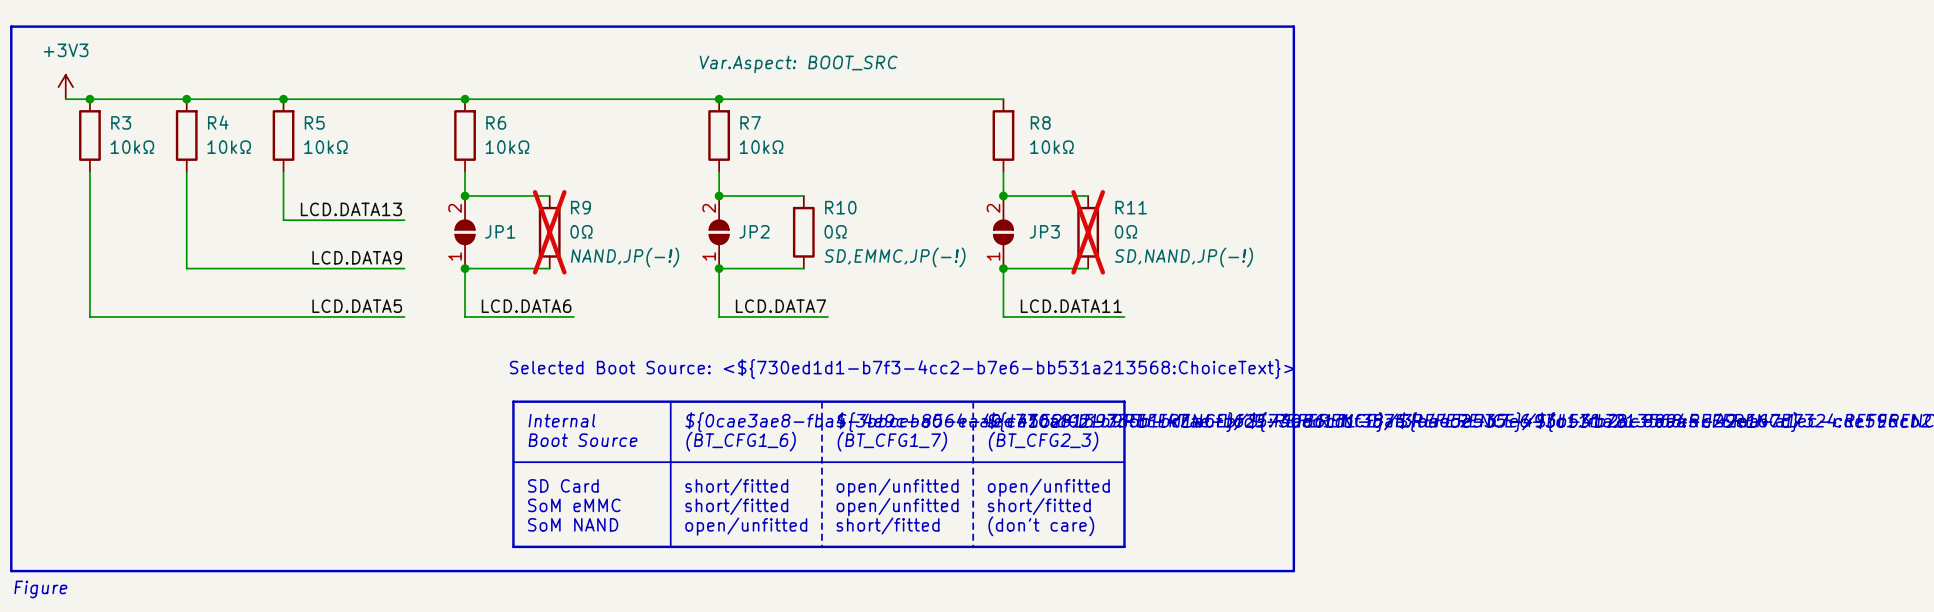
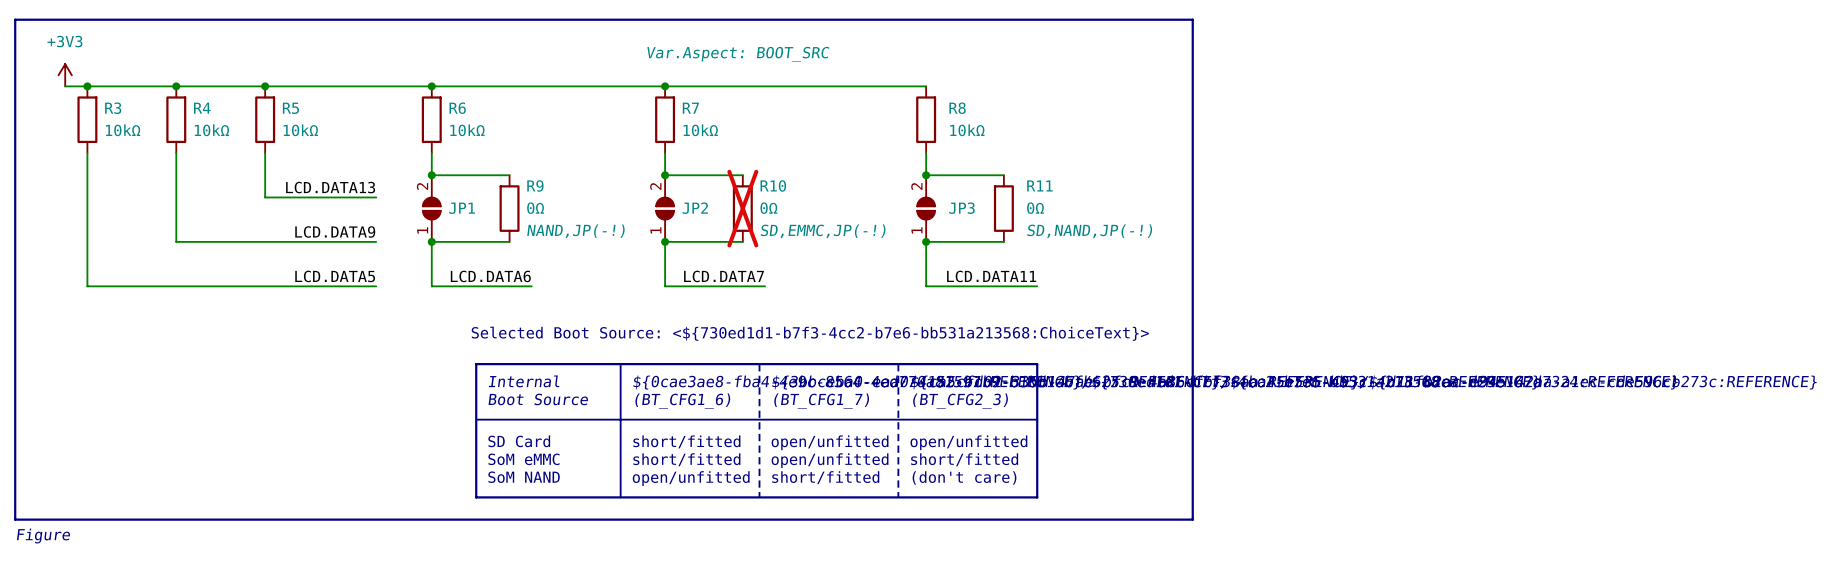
R9 do-not-place cross: (549, 232) -> none
R10 do-not-place cross: none -> (742, 208)
R11 do-not-place cross: (1088, 232) -> none

